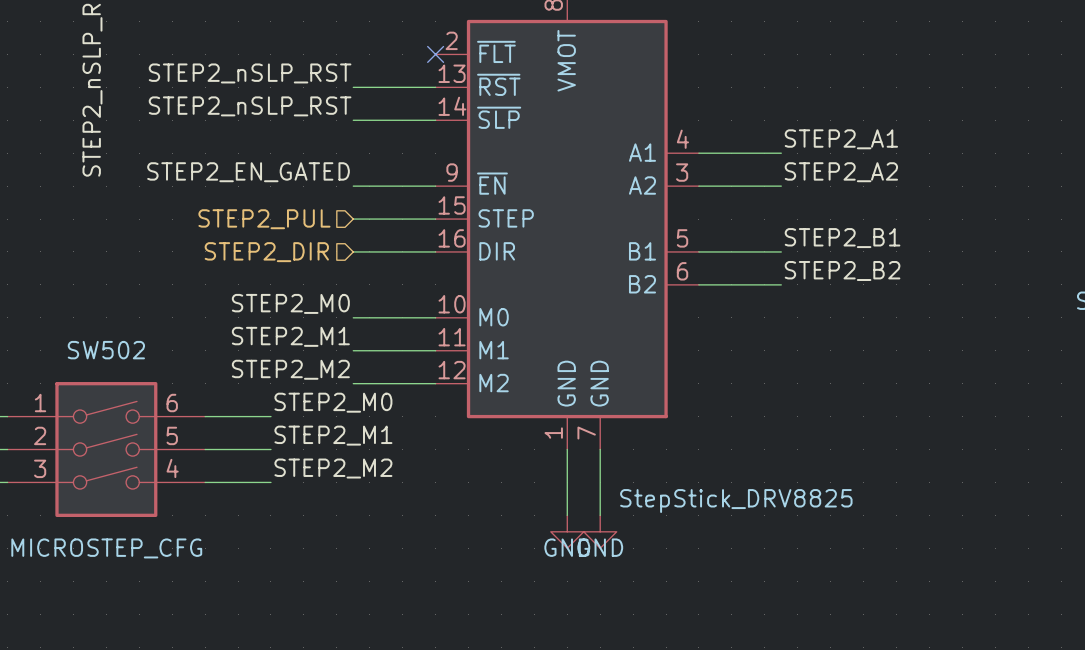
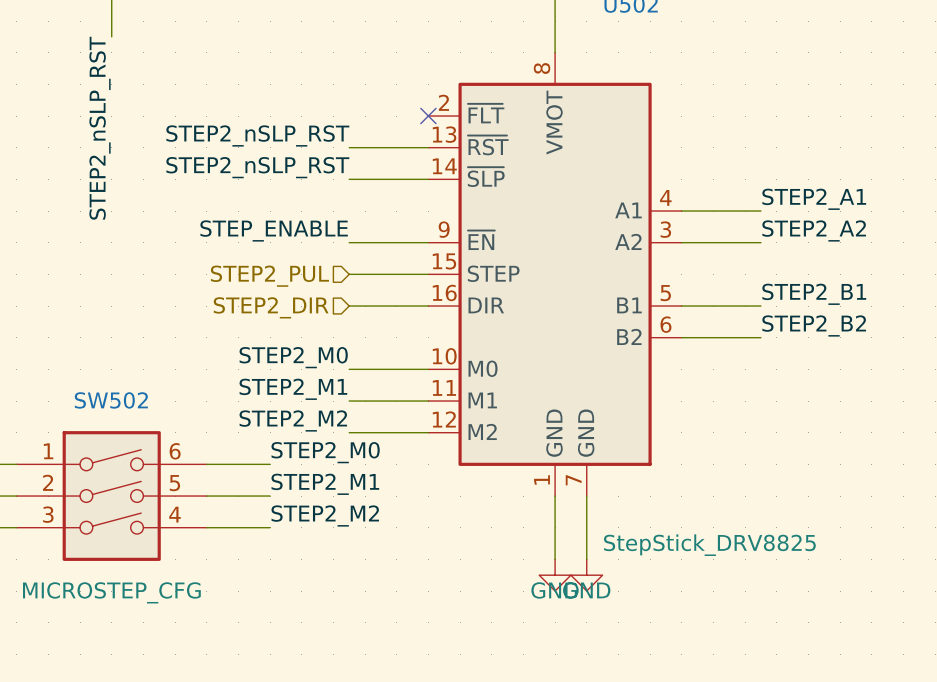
label: STEP2_EN_GATED (248, 172) -> STEP_ENABLE (274, 230)

